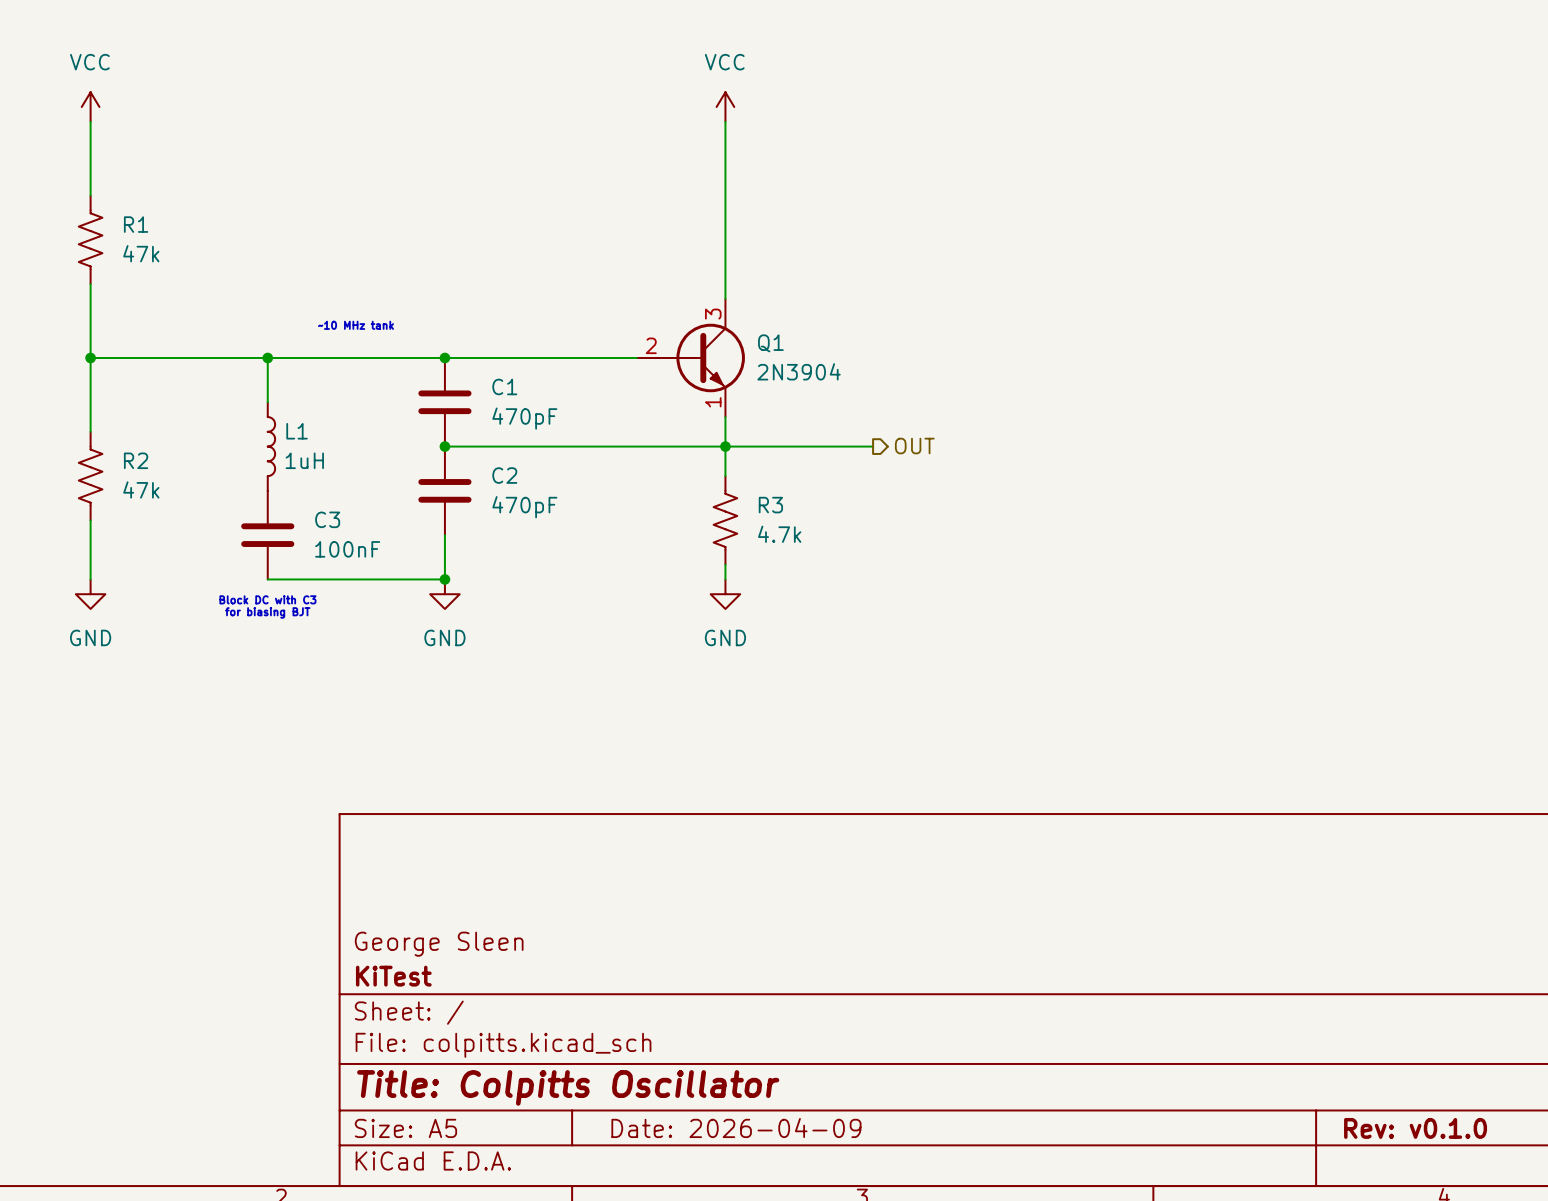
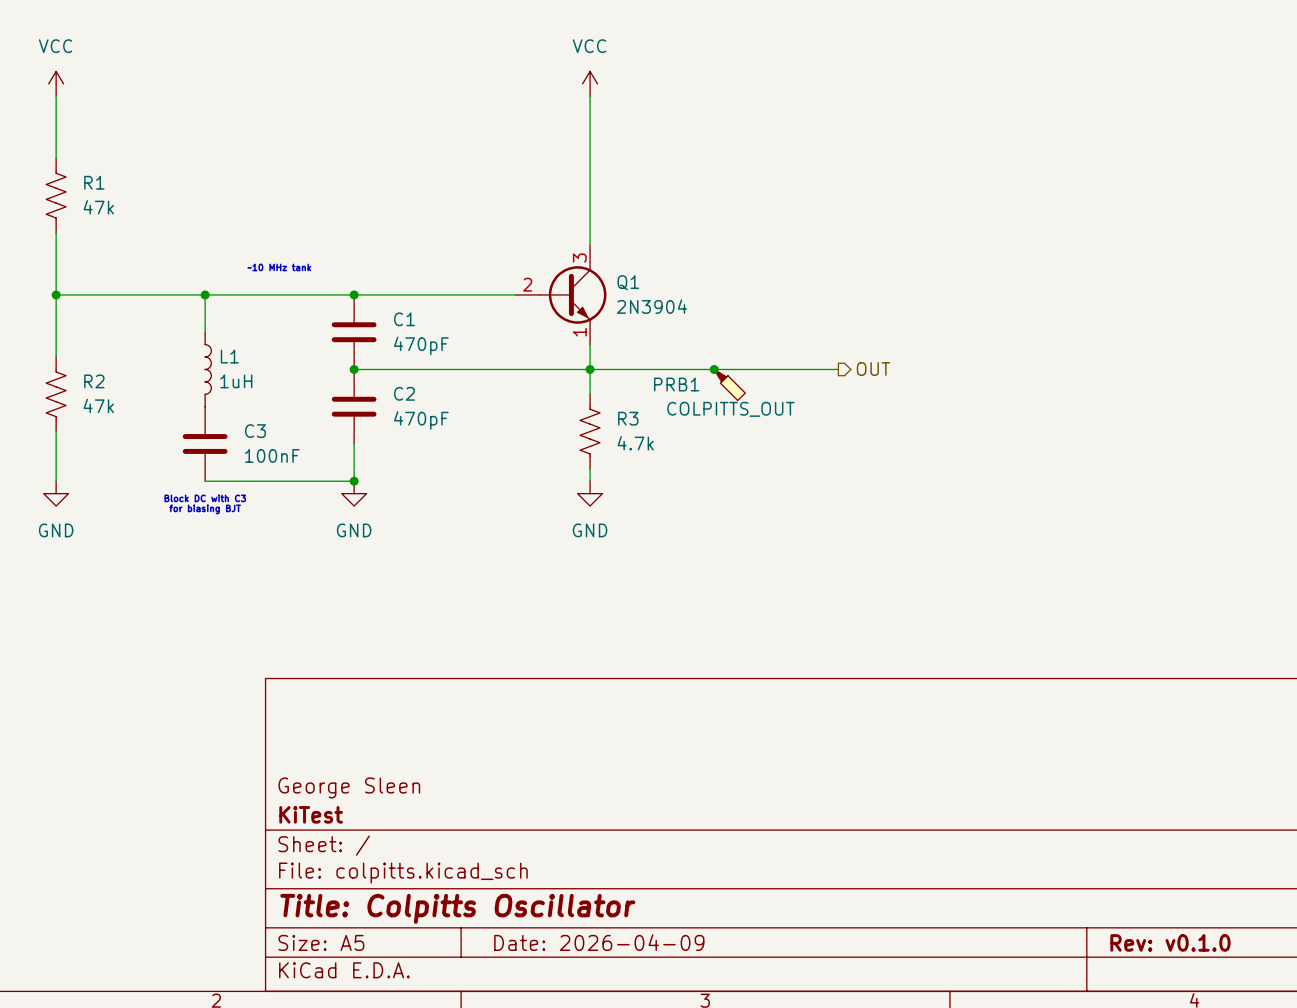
wire: none -> (714, 369) (838, 369)
junction: none -> (714, 369)
hierarchical label position: OUT (914, 446) -> OUT (873, 369)
PRB1: none -> COLPITTS_OUT (729, 385)

